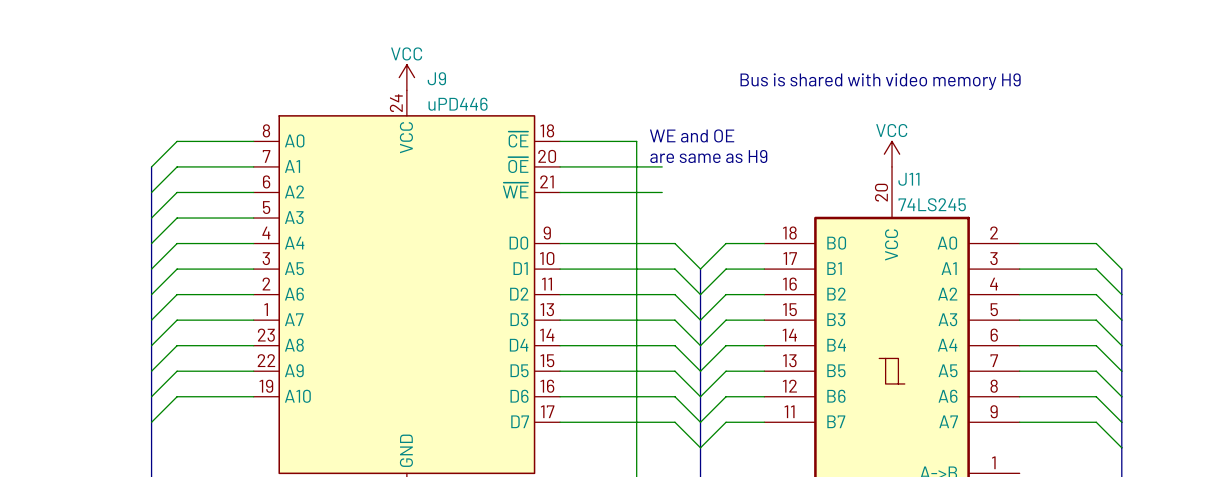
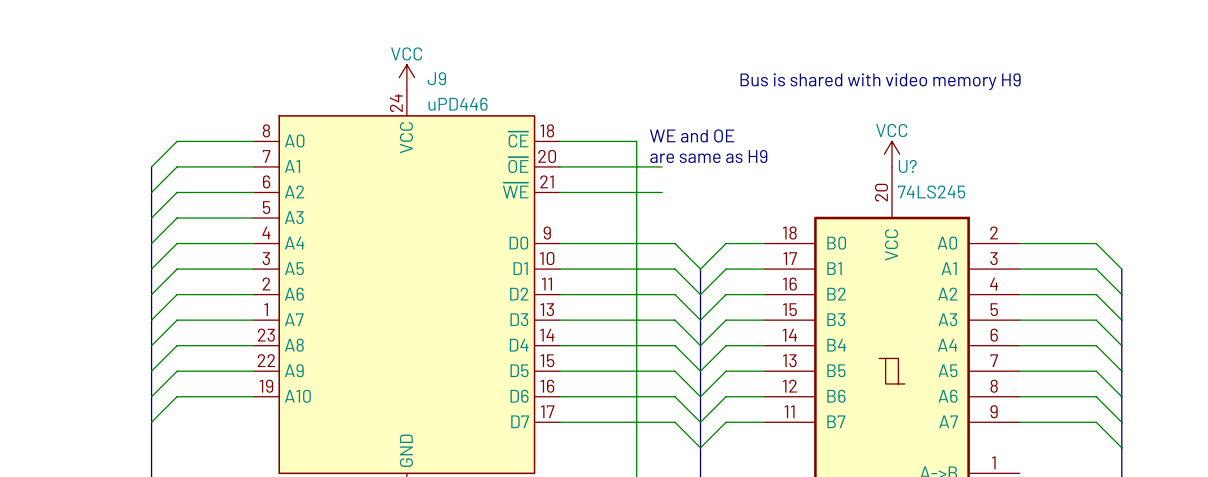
J11 name: J11 (908, 179) -> U? (907, 166)
J11 value position: 74LS245 (932, 204) -> 74LS245 (931, 192)

